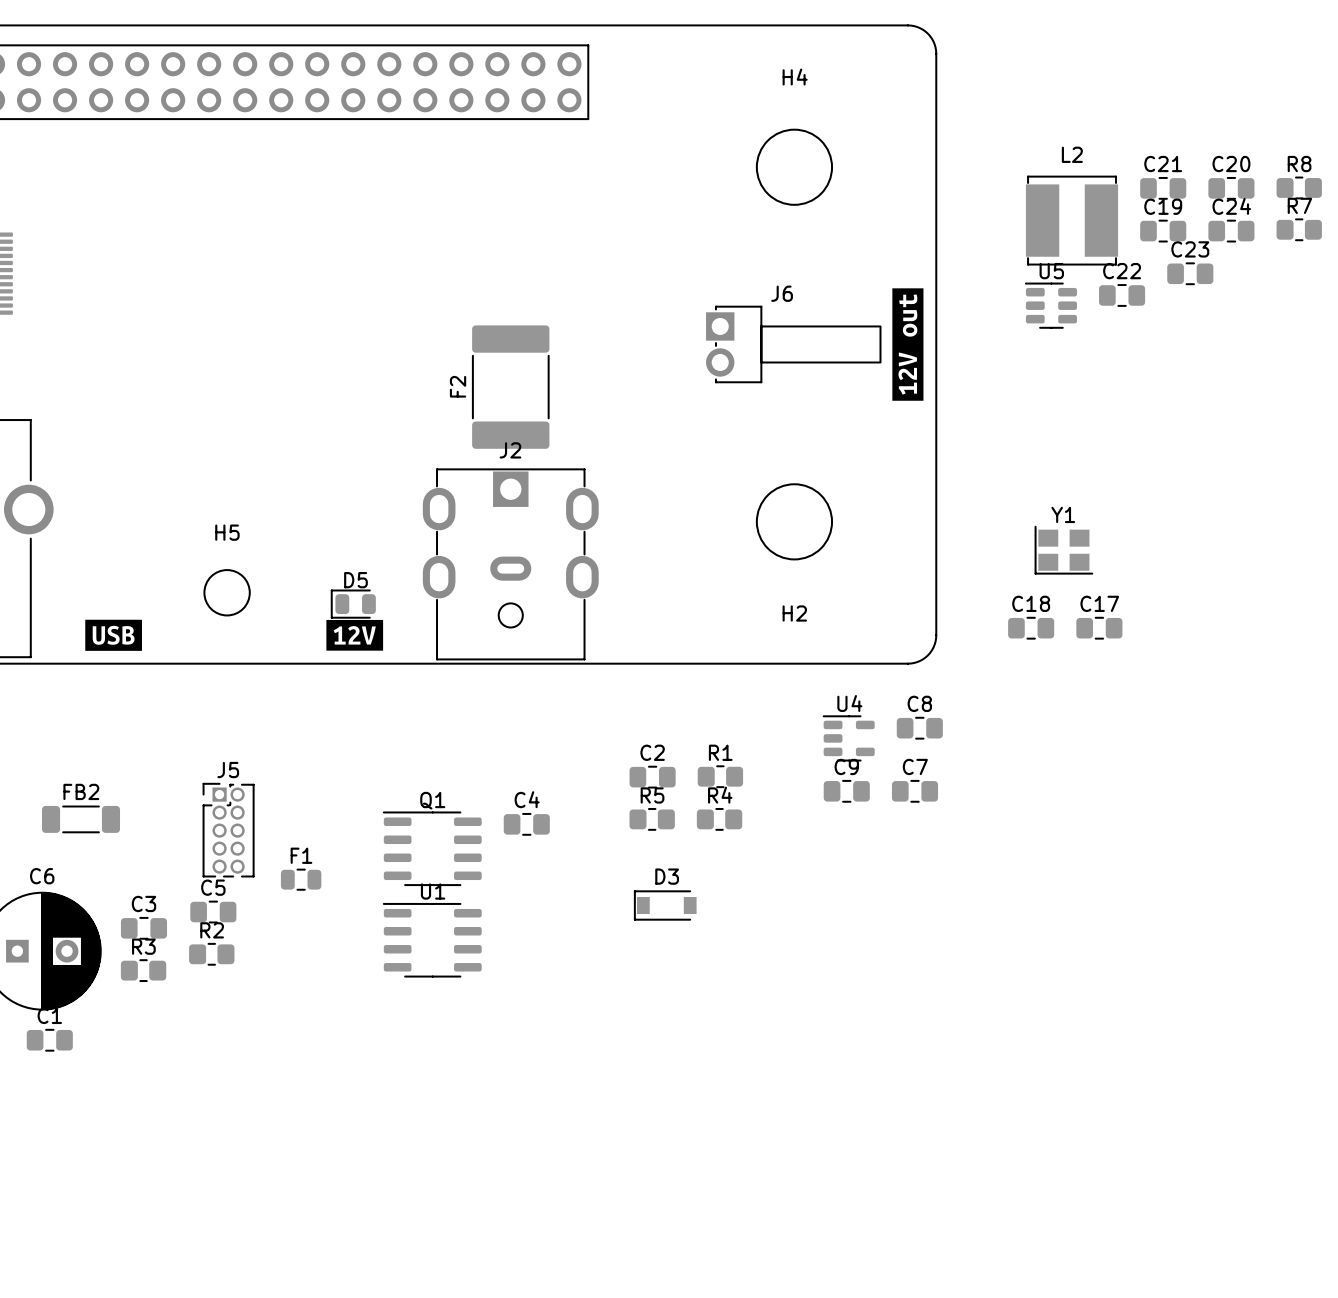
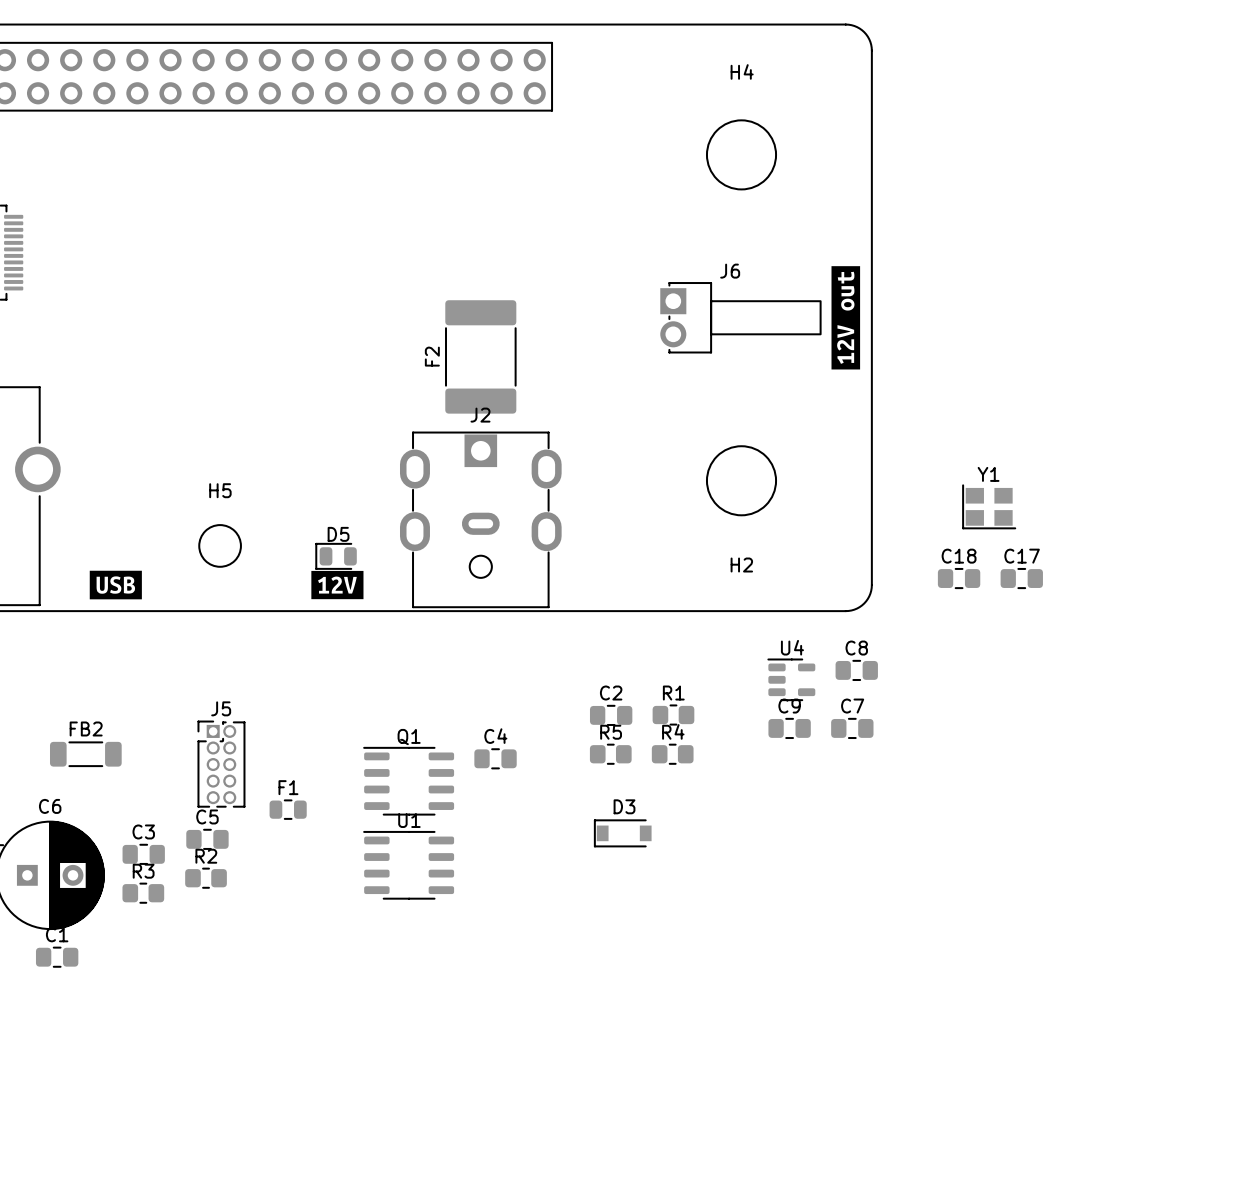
R8: (1299, 187) -> none
C21: (1163, 188) -> none
C20: (1231, 188) -> none
L2: (1072, 220) -> none
R7: (1299, 229) -> none
C19: (1163, 231) -> none
C24: (1231, 231) -> none
C23: (1190, 273) -> none
C22: (1122, 295) -> none
U5: (1051, 305) -> none

